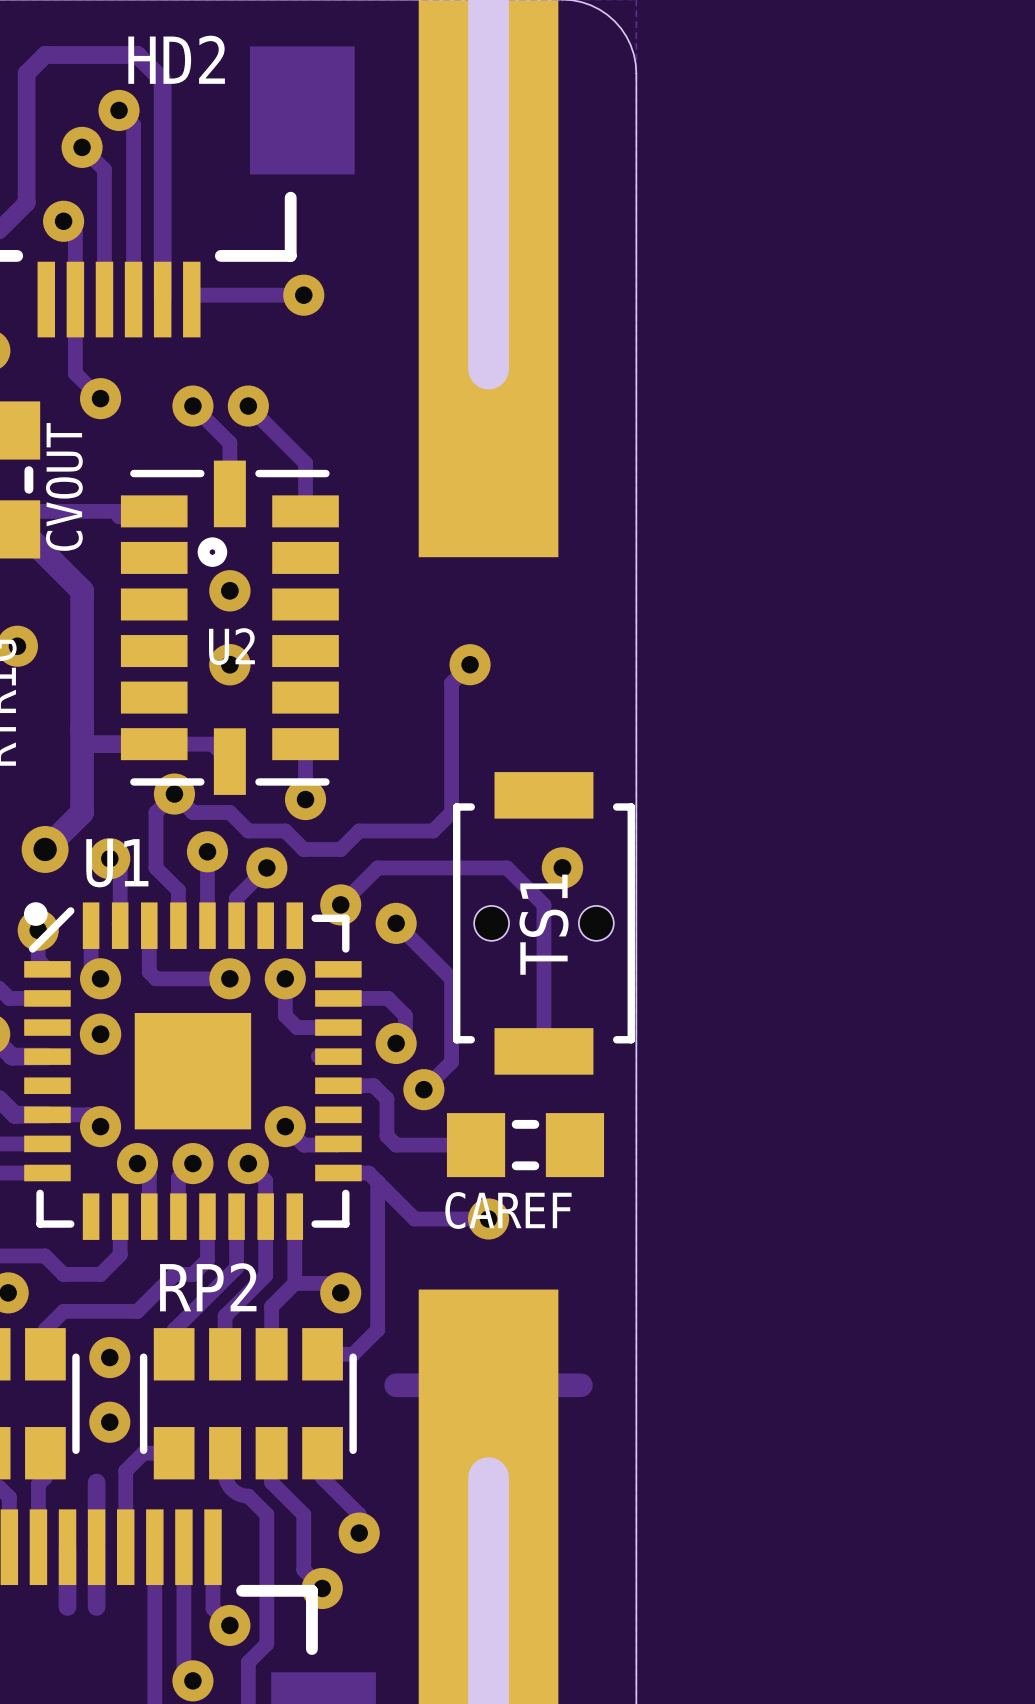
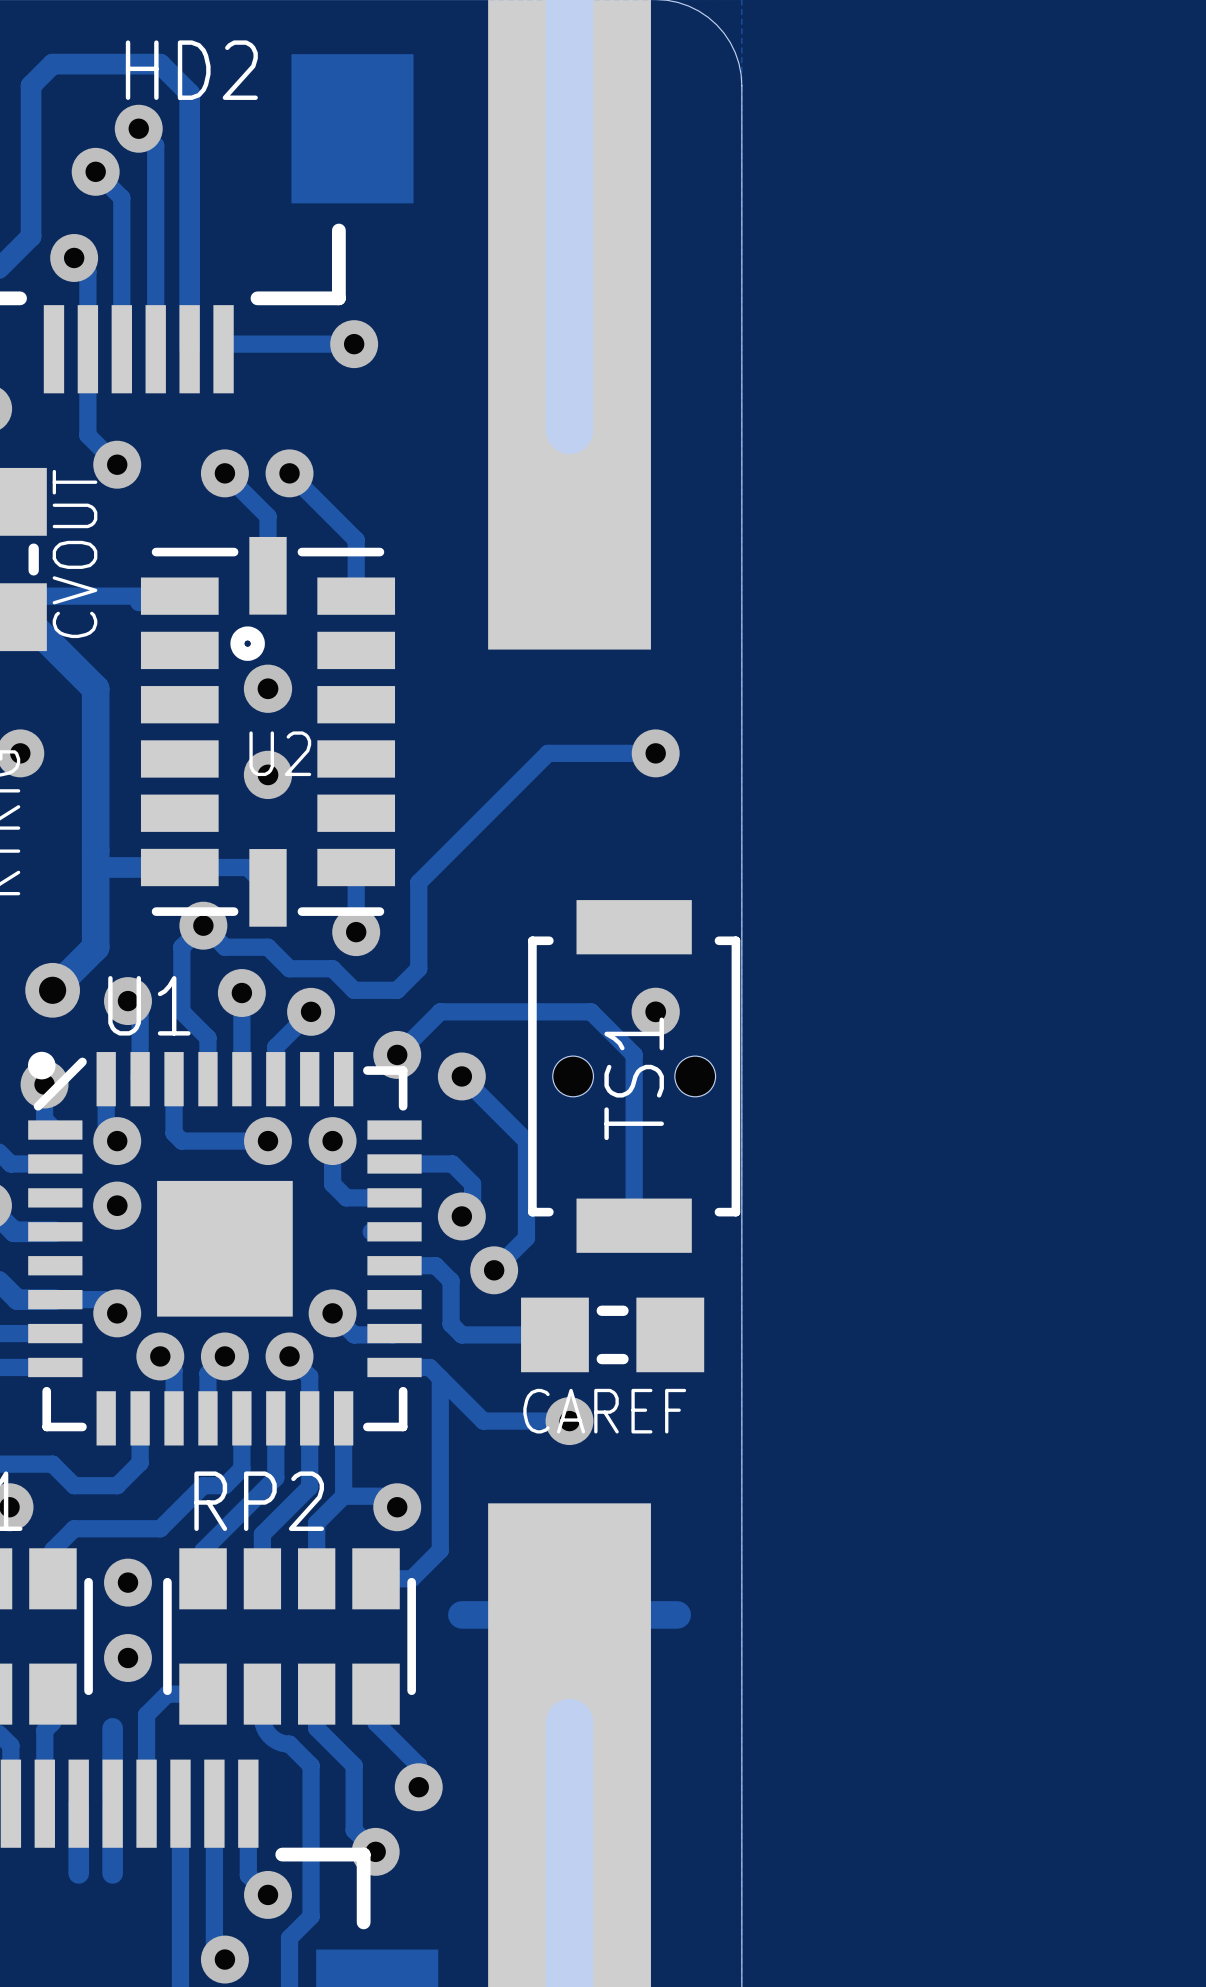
track: (470, 664) (451, 683) (451, 812) (433, 830) (359, 830) -> (655, 753) (548, 753) (418, 882) (418, 968)
via position: (470, 664) -> (655, 753)

